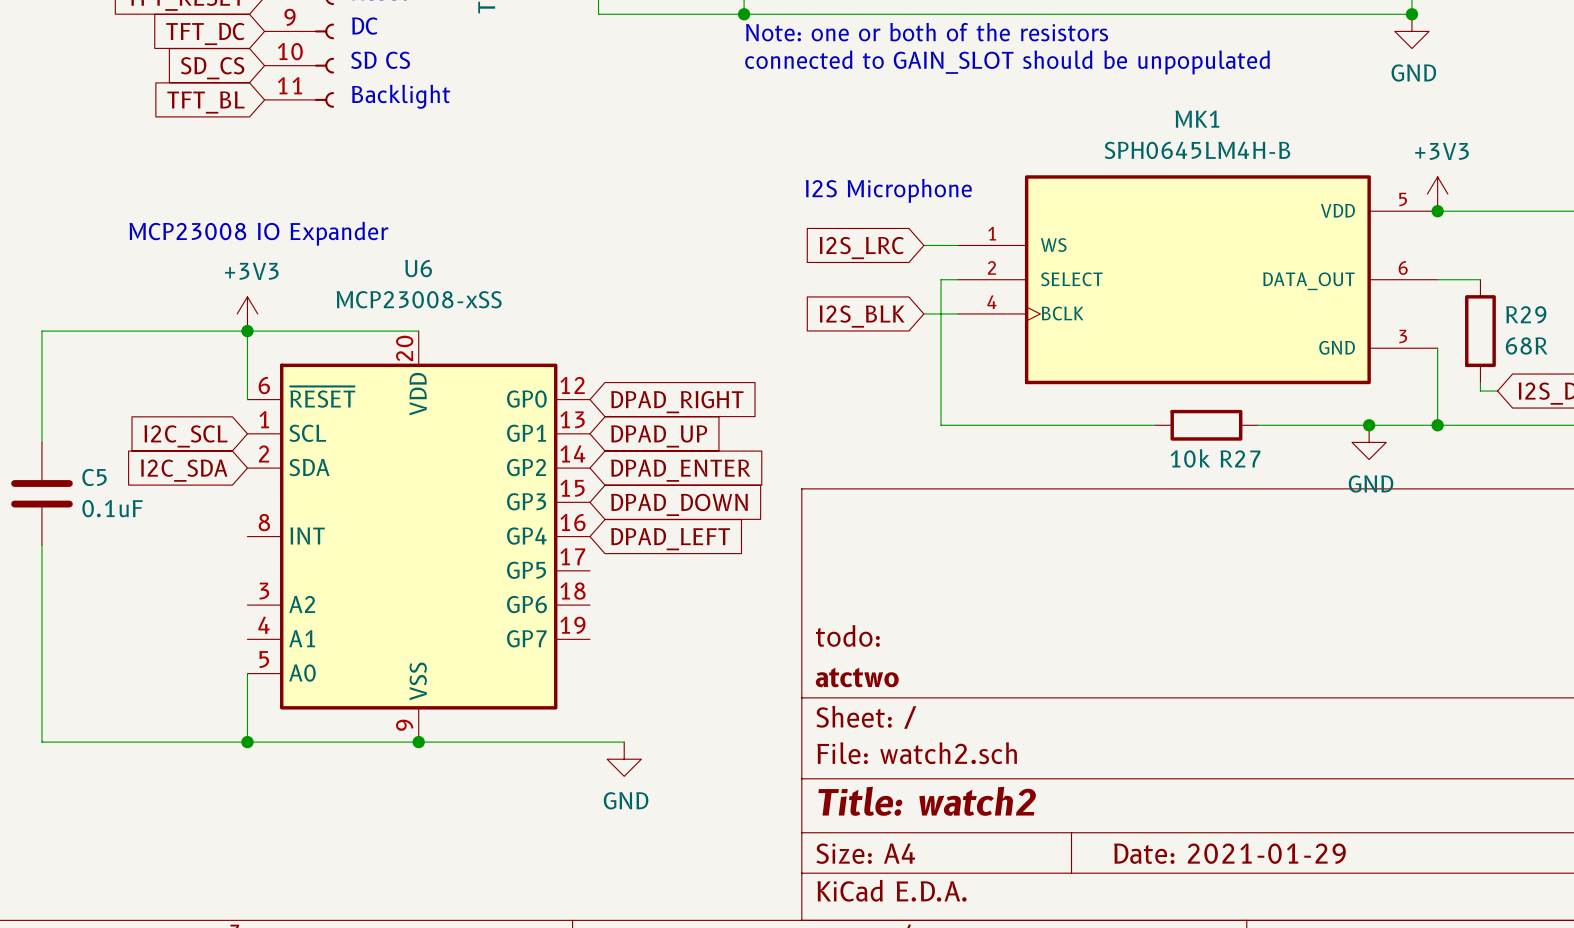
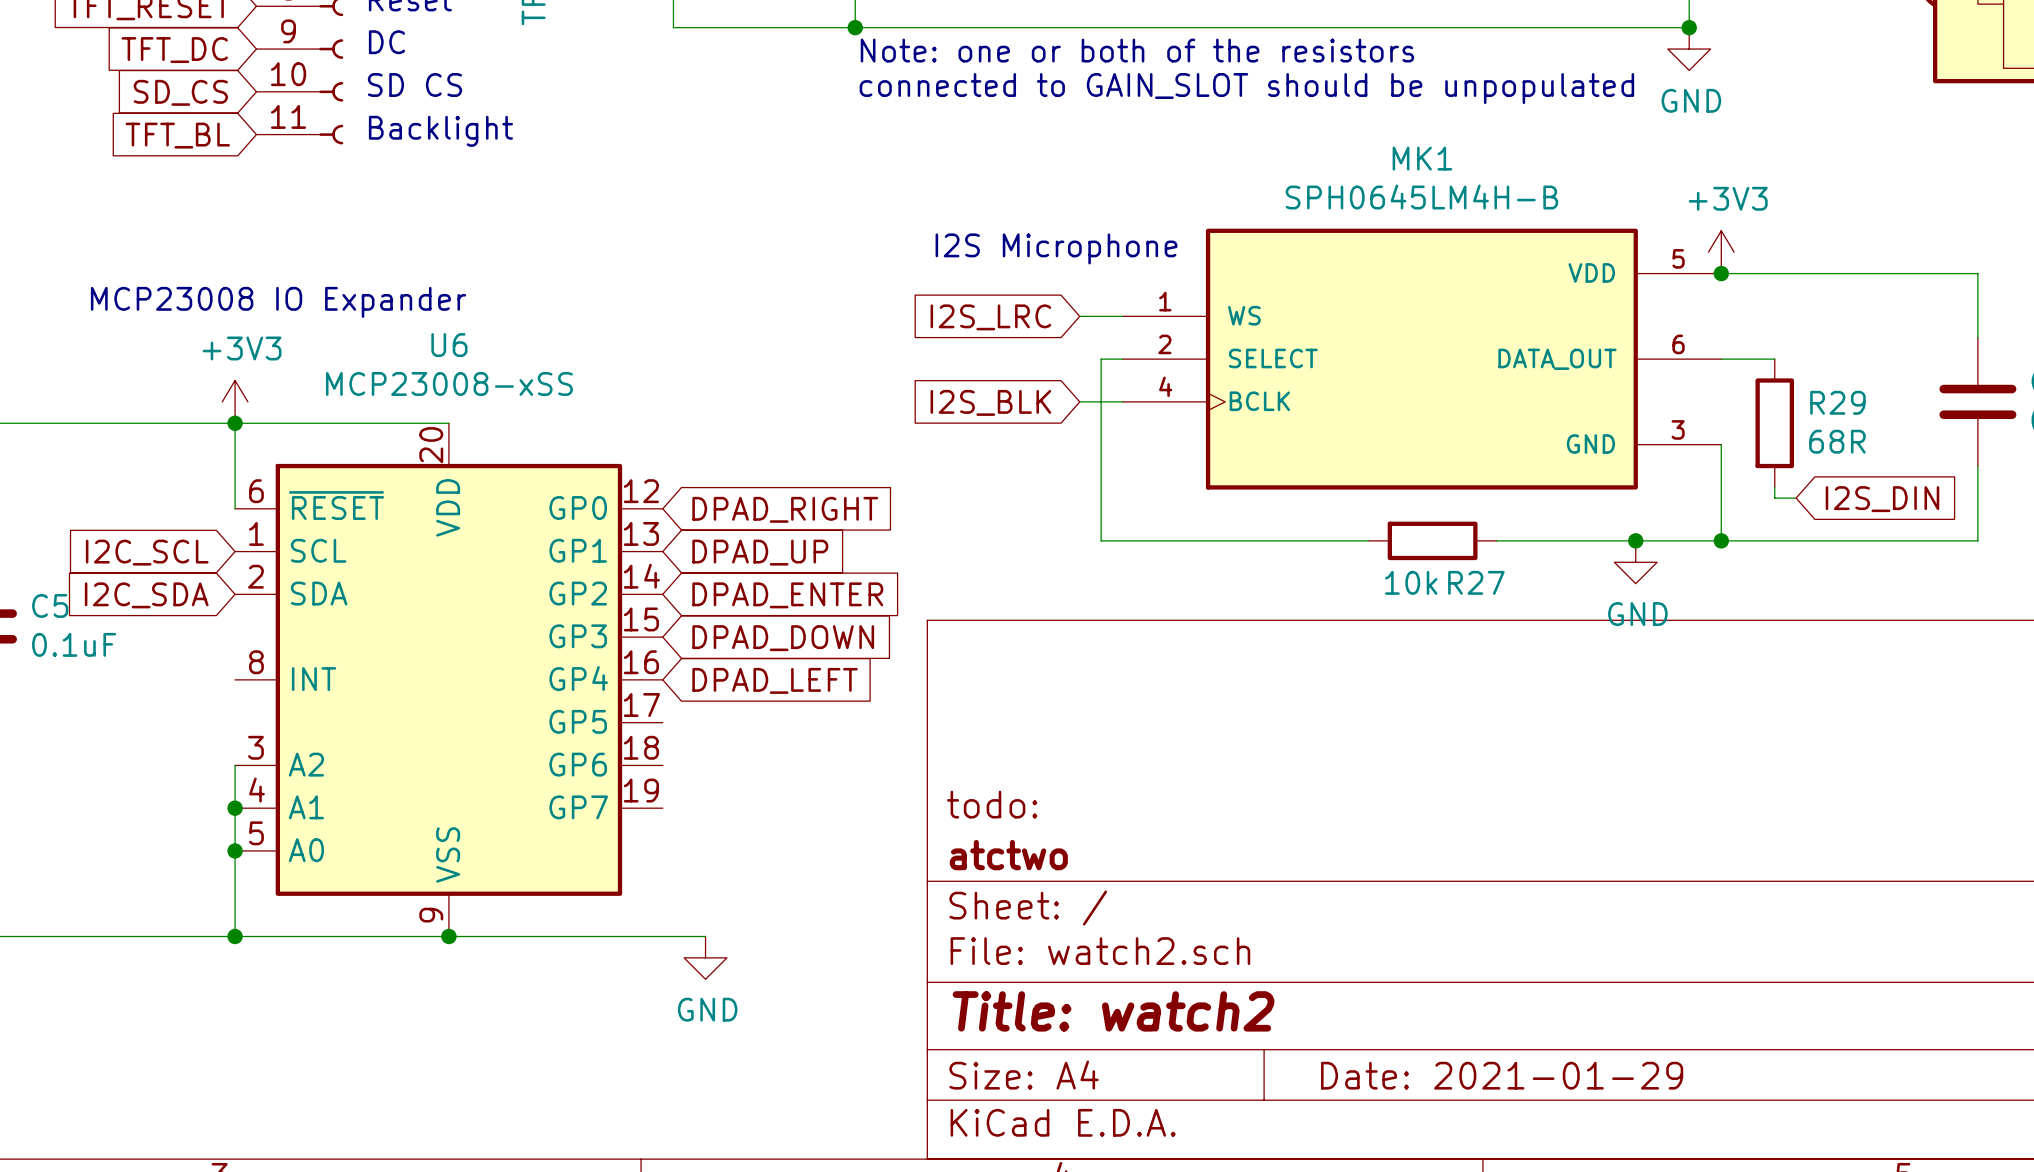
wire: none -> (235, 765) (235, 850)
junction: none -> (235, 808)
junction: none -> (235, 850)

